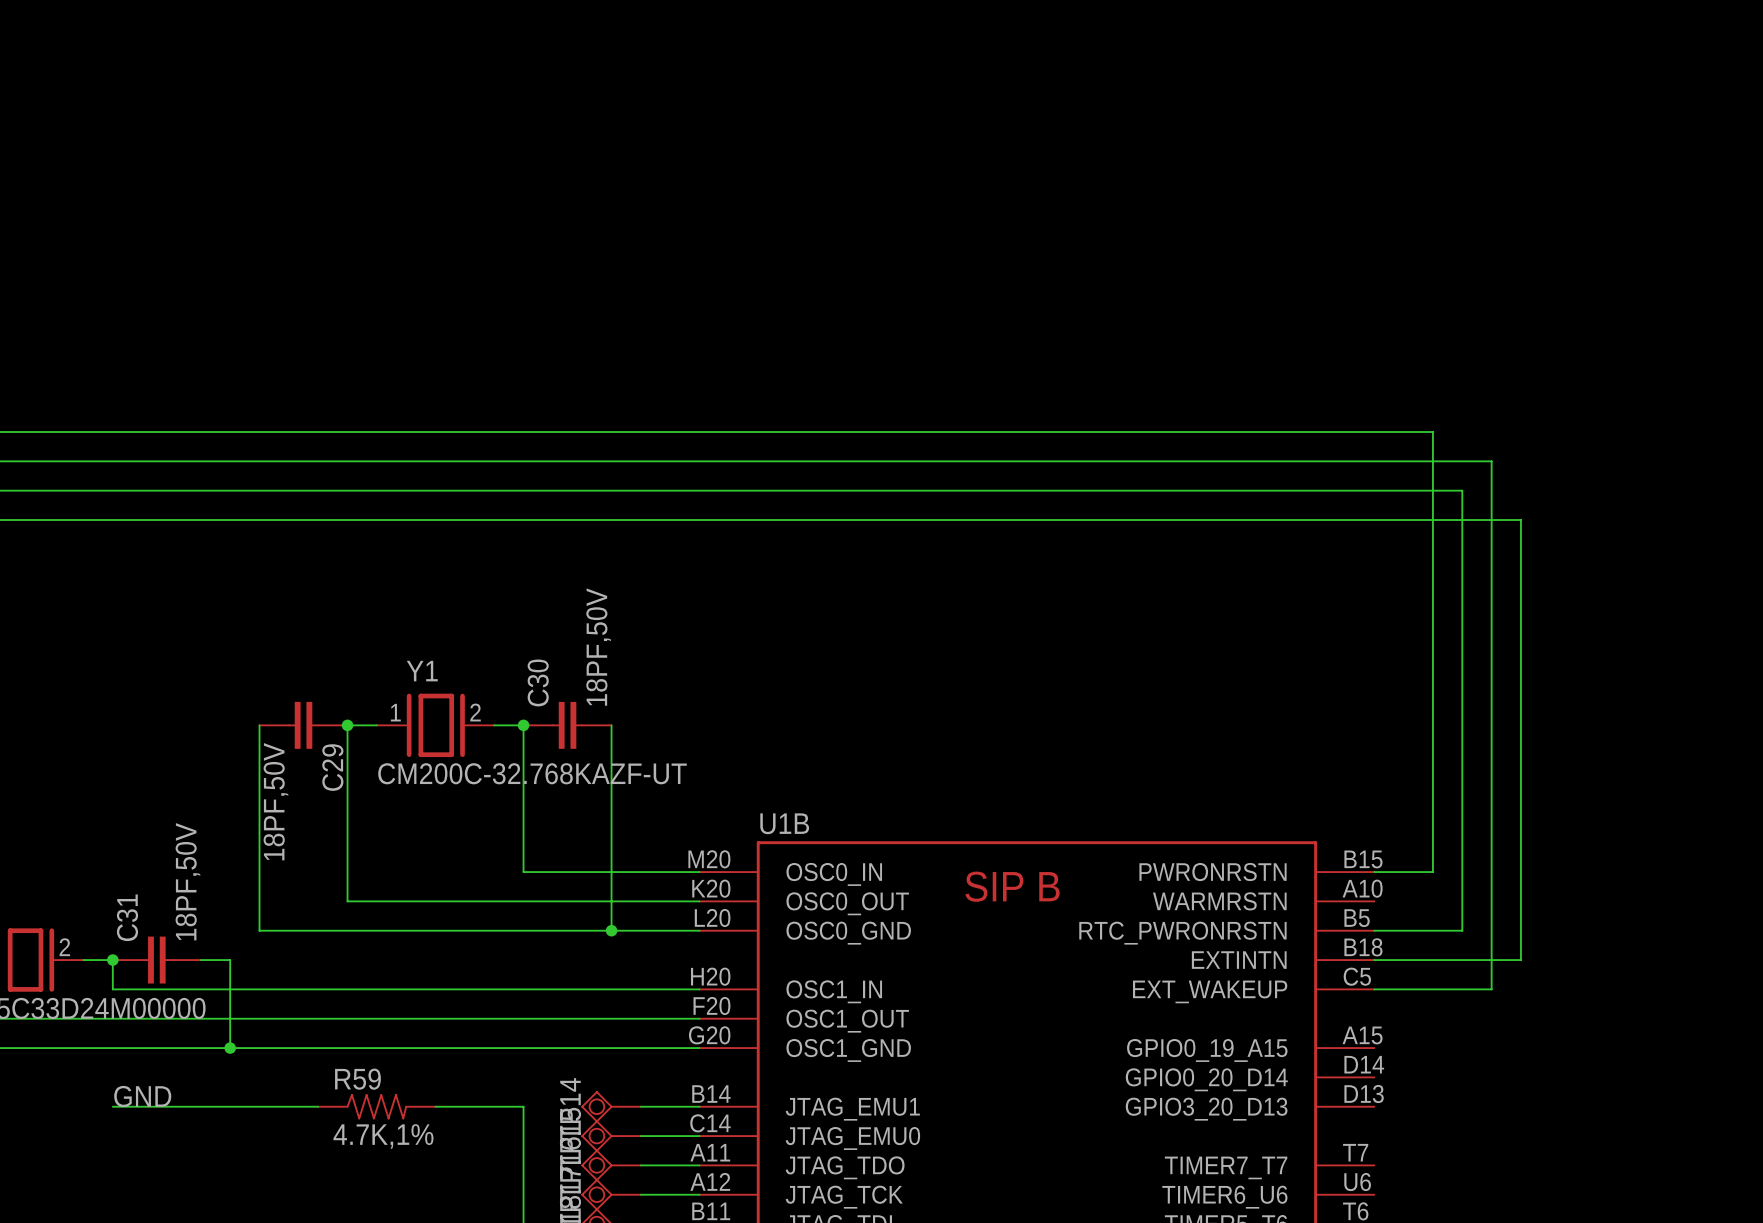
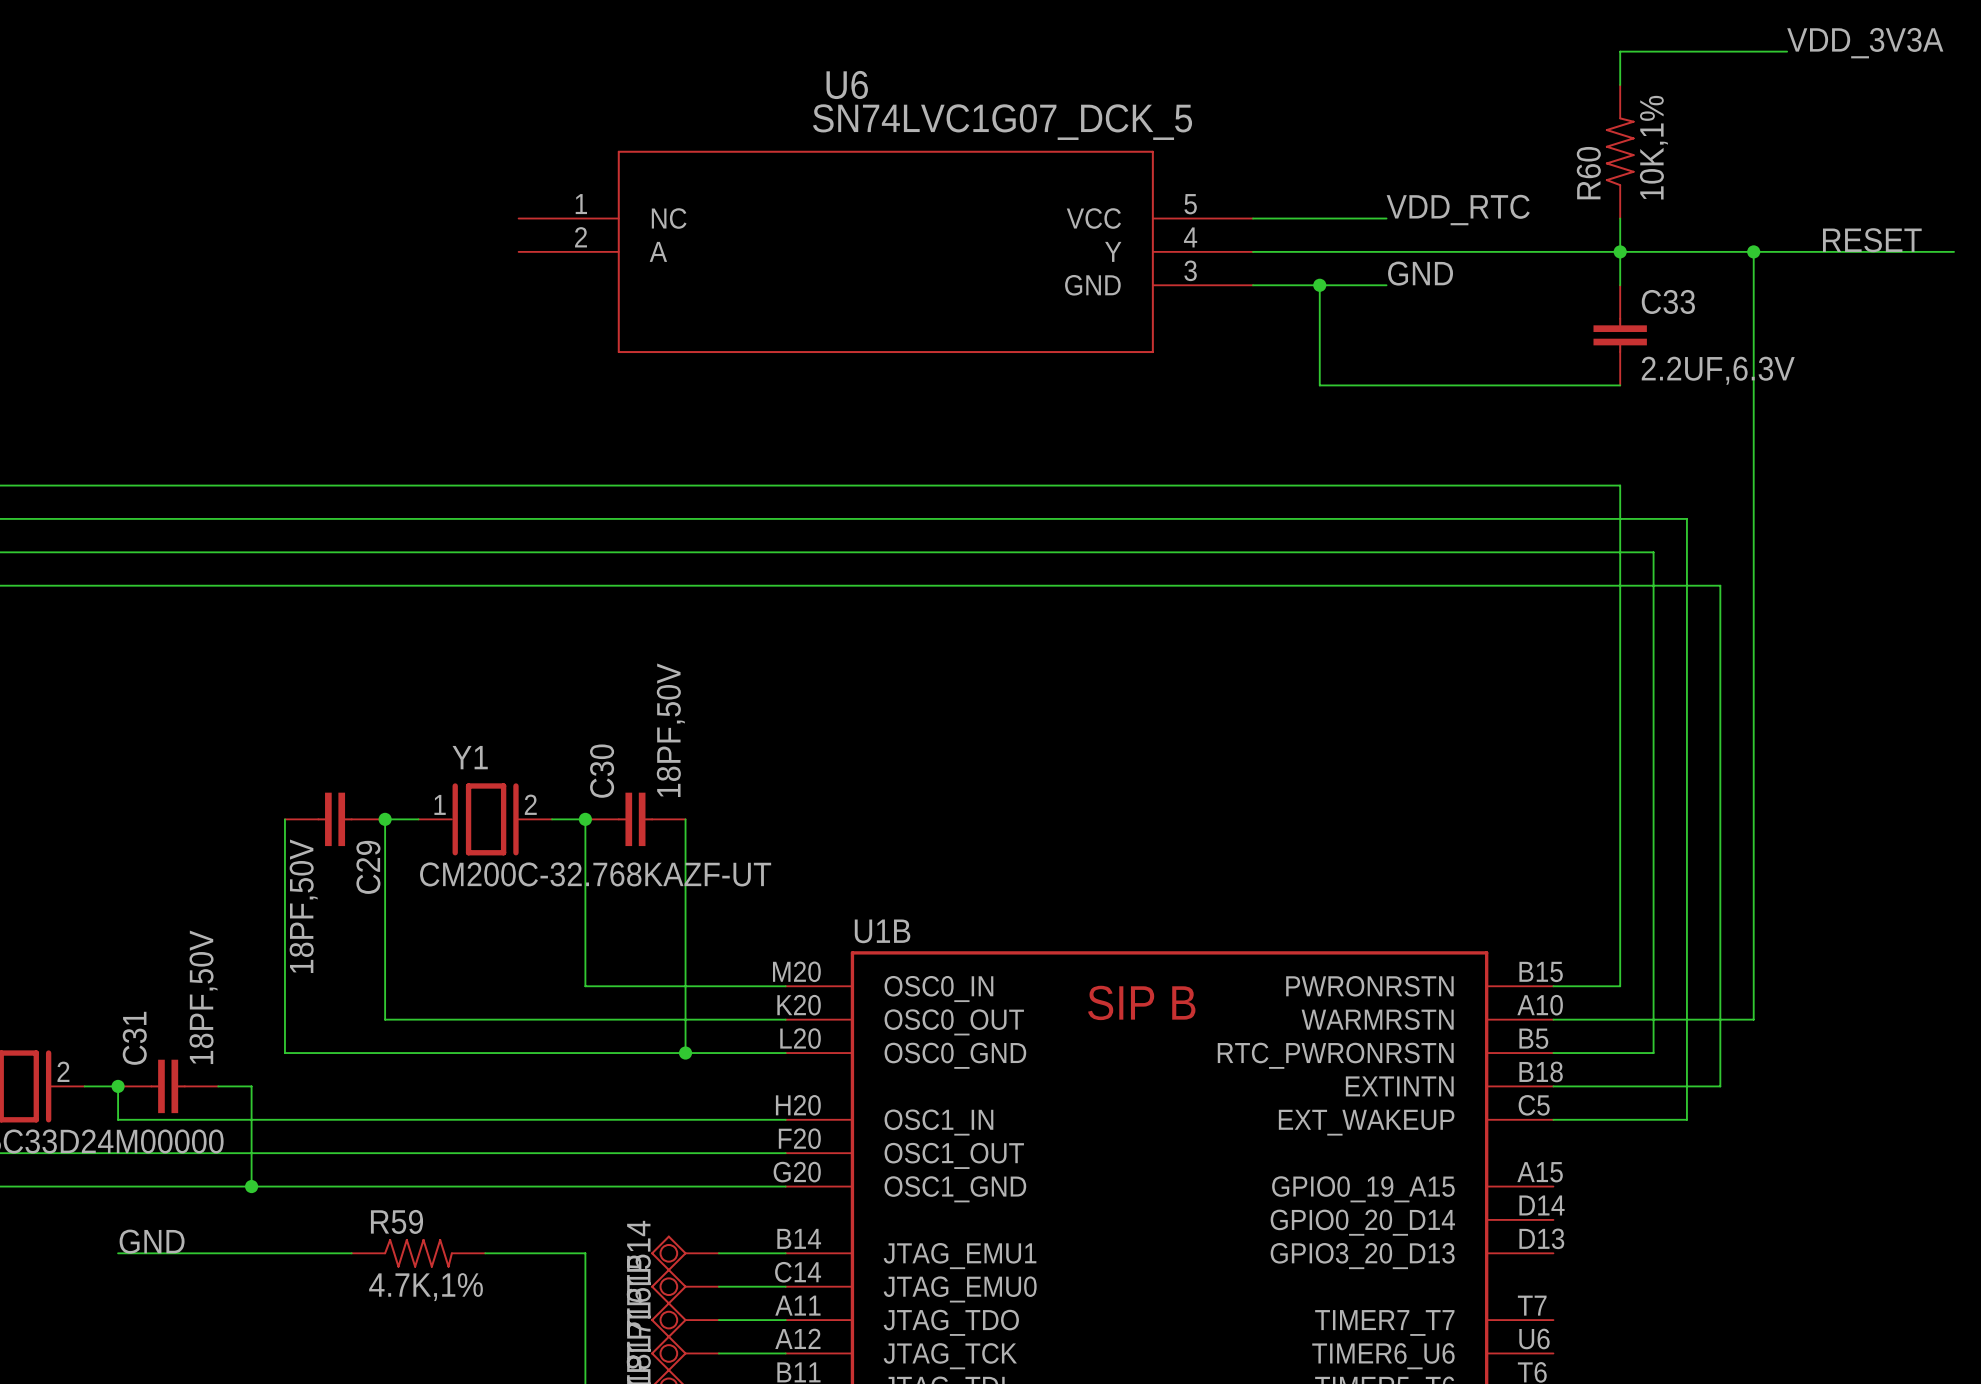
label: none -> VDD_3V3A (1865, 43)
wire: none -> (1787, 51) (1620, 51) (1620, 84)
R60: none -> 10K,1% (1620, 151)
label: none -> VDD_RTC (1458, 210)
wire: none -> (1253, 218) (1386, 218)
wire: none -> (1620, 218) (1620, 285)
label: none -> RESET (1872, 240)
U6: none -> SN74LVC1G07_DCK_5 (885, 251)
wire: none -> (1253, 251) (1954, 251)
junction: none -> (1620, 251)
wire: none -> (1753, 251) (1753, 1019) (1553, 1019)
junction: none -> (1753, 251)
label: none -> GND (1420, 273)
wire: none -> (1253, 285) (1386, 285)
wire: none -> (1319, 285) (1319, 385) (1620, 385)
junction: none -> (1319, 285)
C33: none -> 2.2UF,6.3V (1620, 335)

